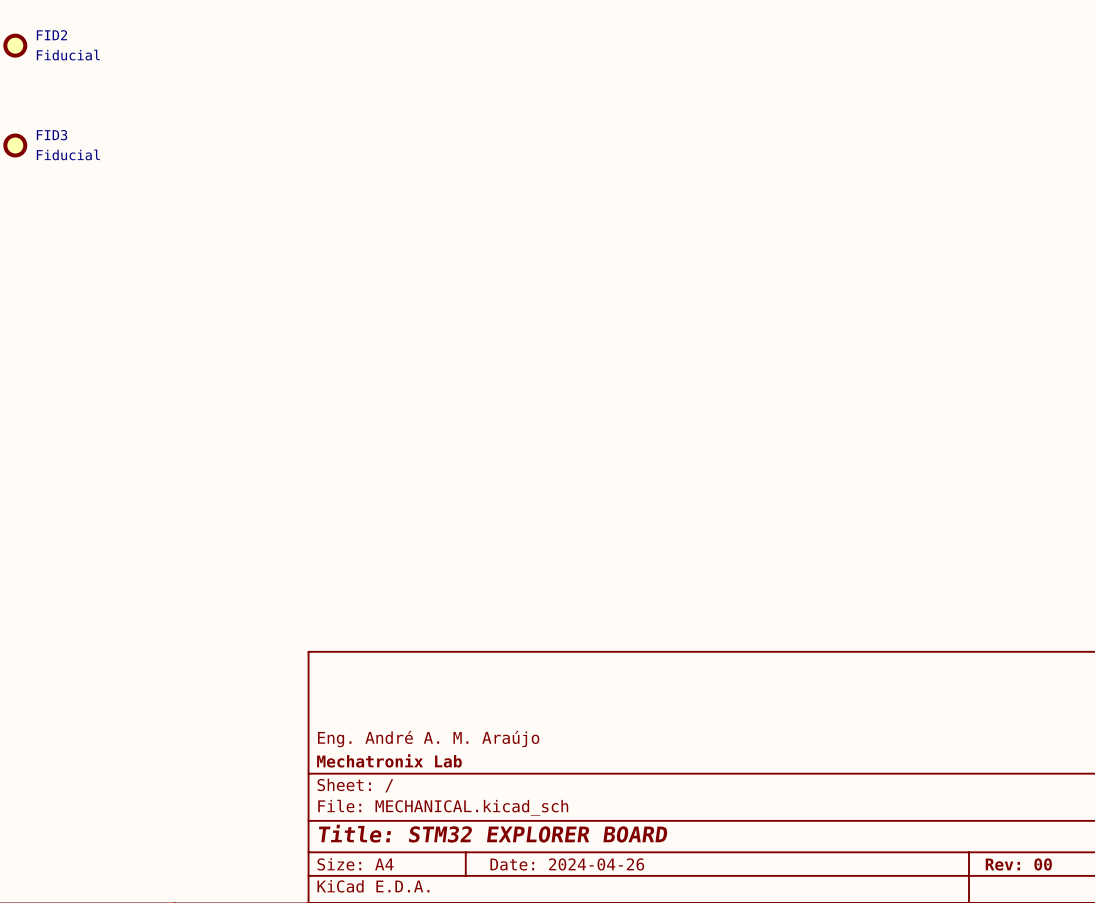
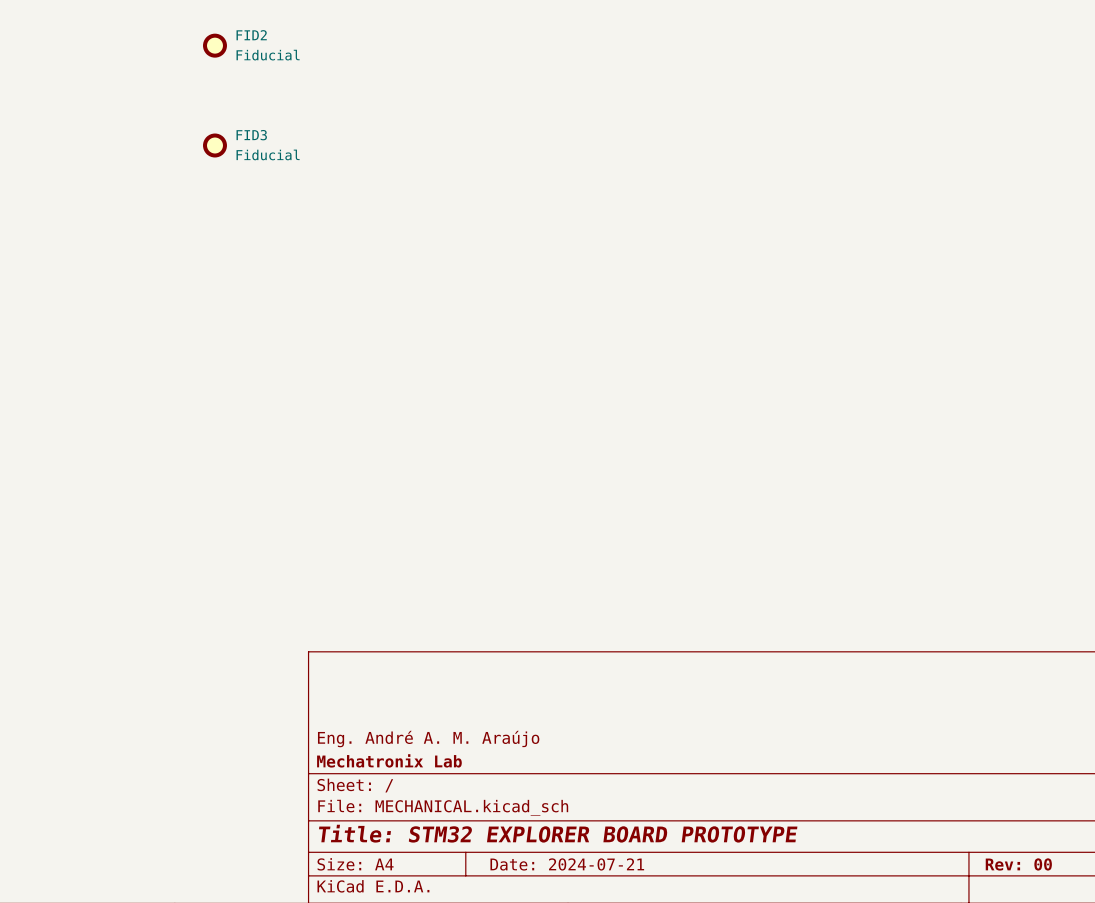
FID2 position: (15, 45) -> (214, 45)
FID3 position: (15, 145) -> (214, 145)
title block: Title: STM32 EXPLORER BOARD (493, 833) -> Title: STM32 EXPLORER BOARD PROTOTYPE (558, 833)
title block: Date: 2024-04-26 (567, 864) -> Date: 2024-07-21 (567, 864)

